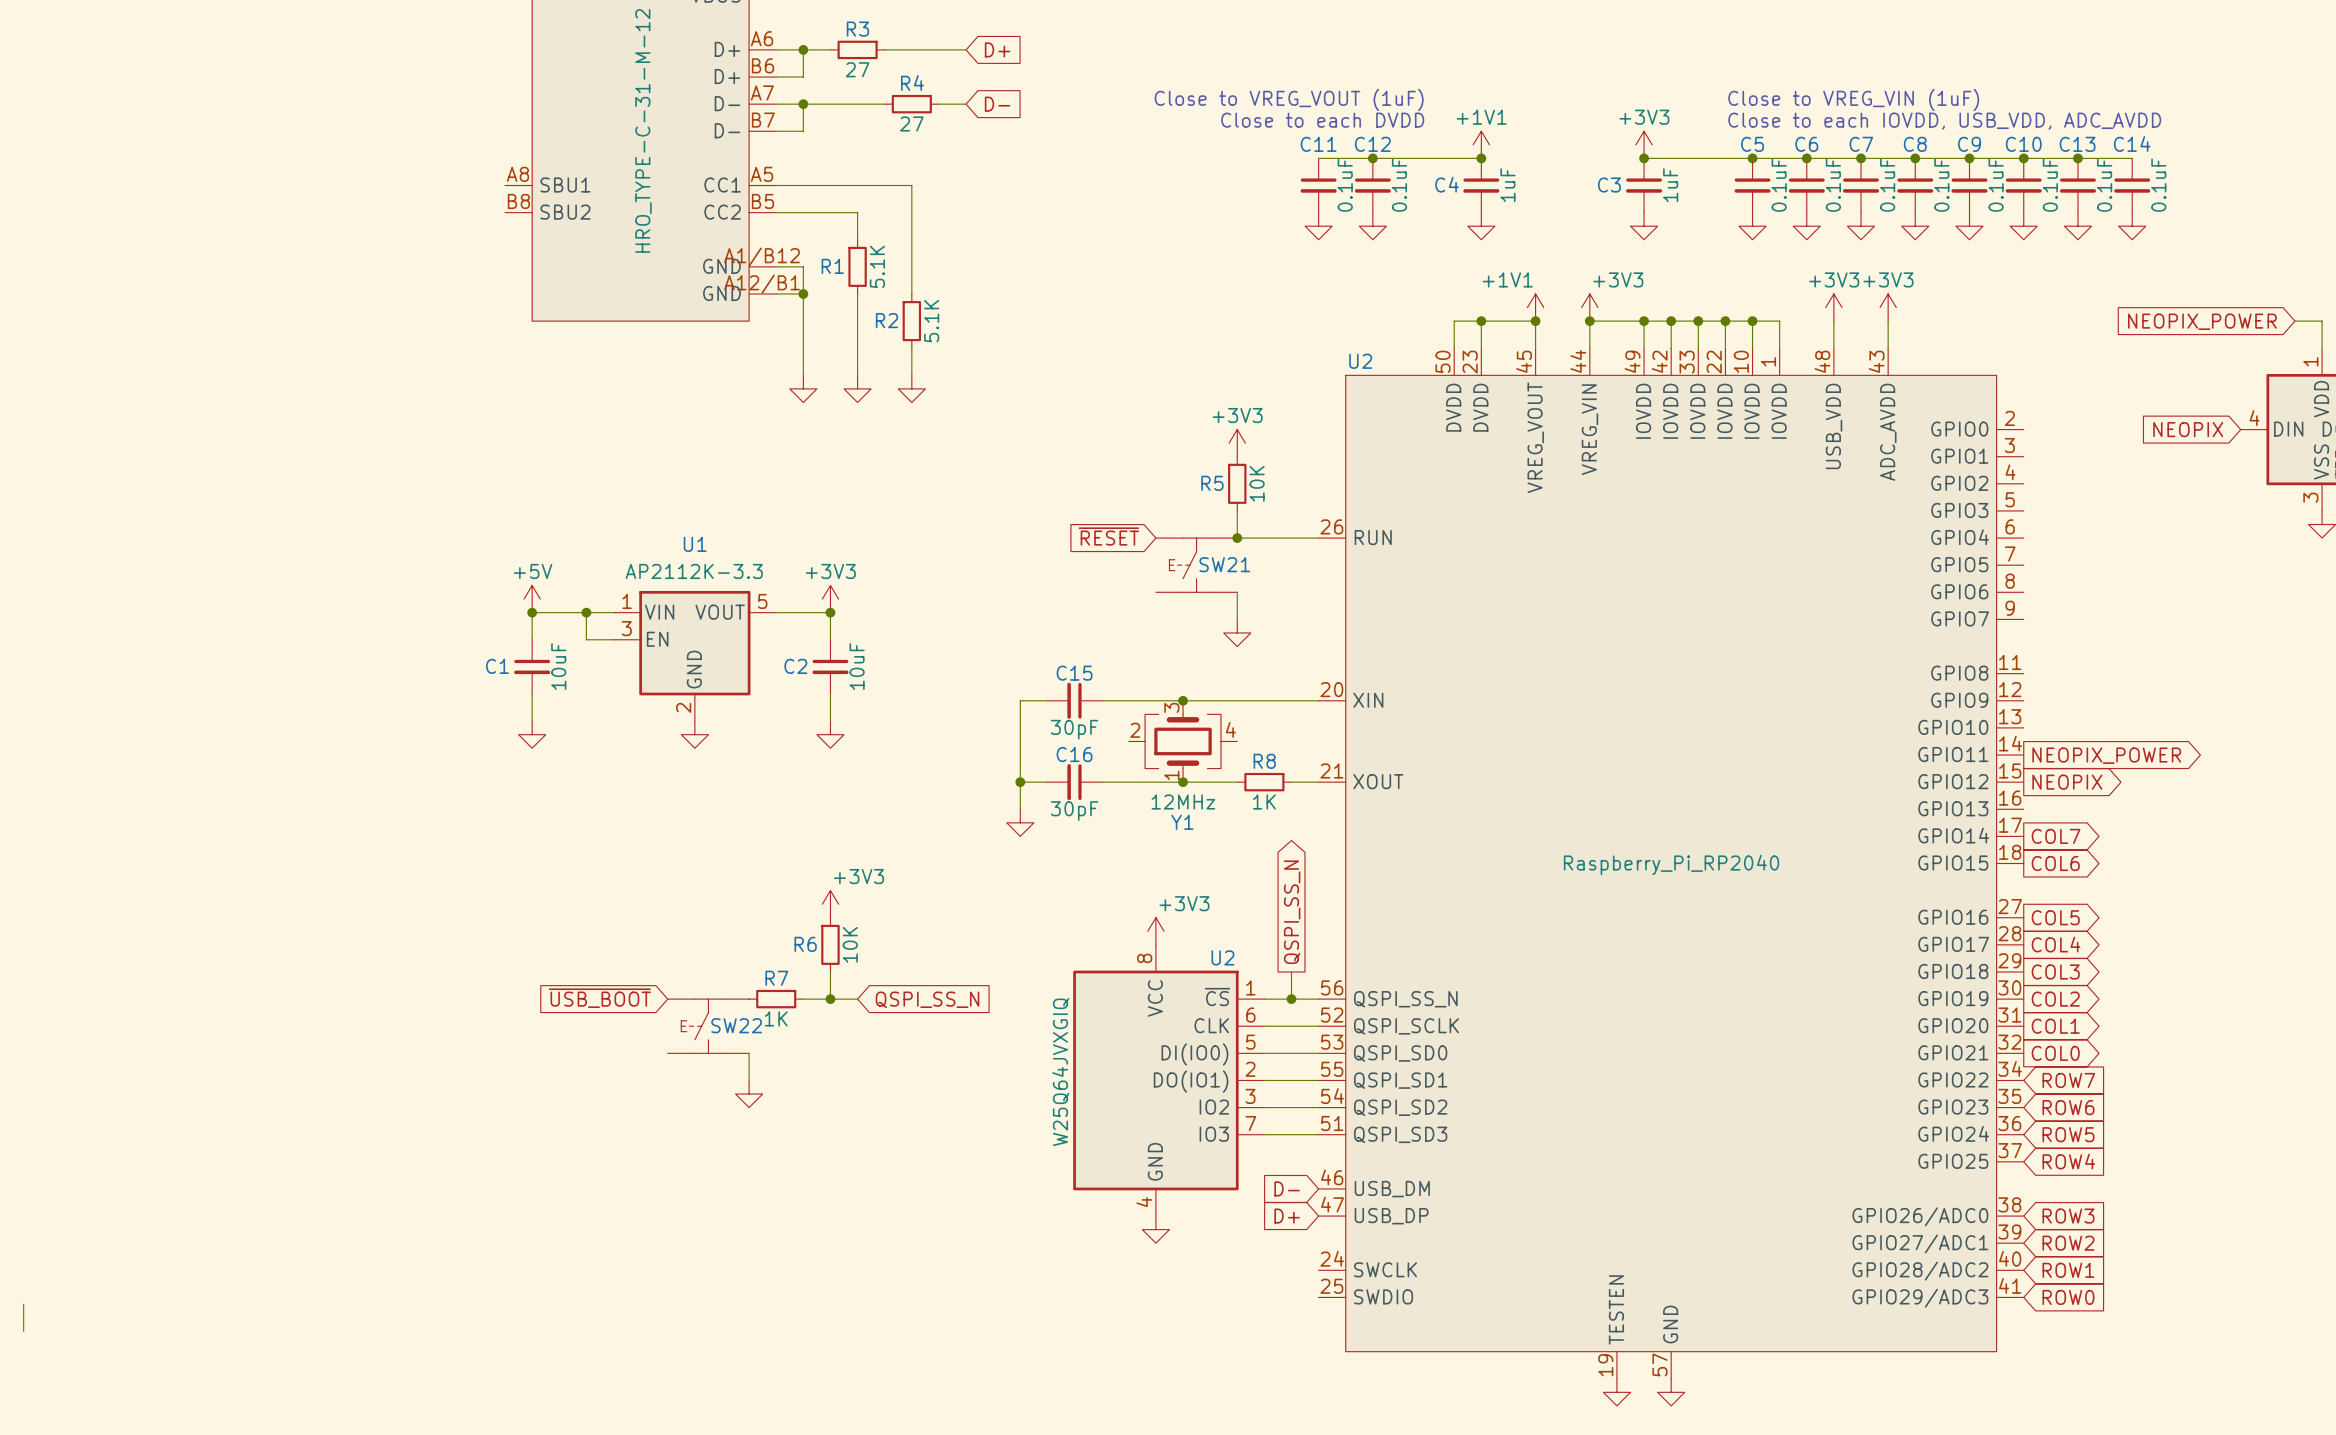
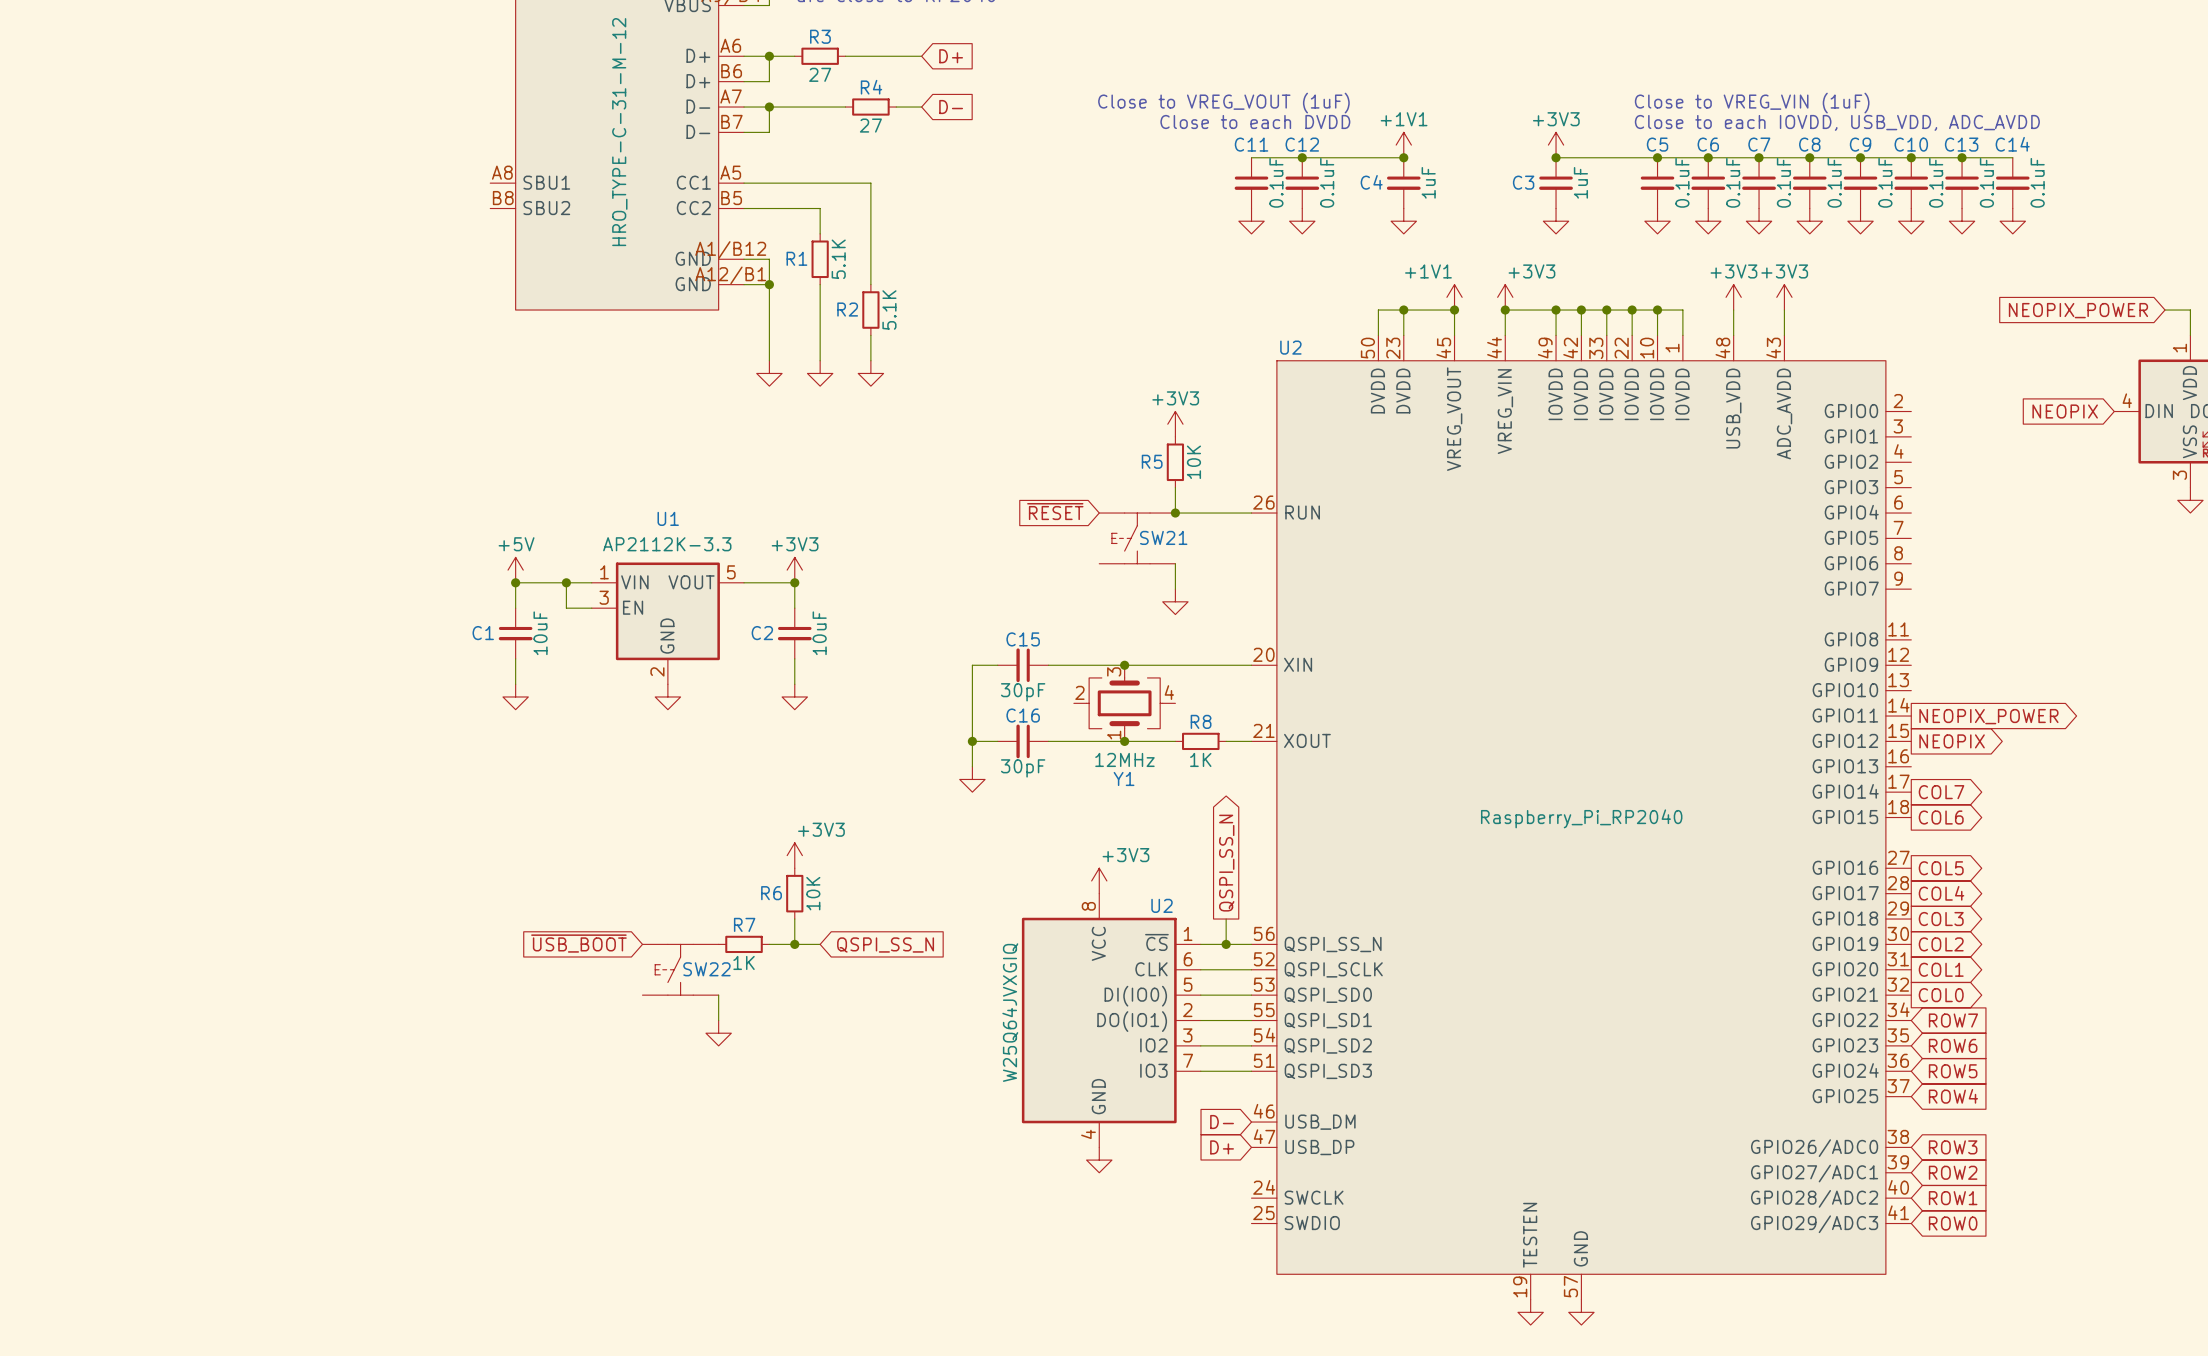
wire: (23, 1304) (23, 1331) -> none

